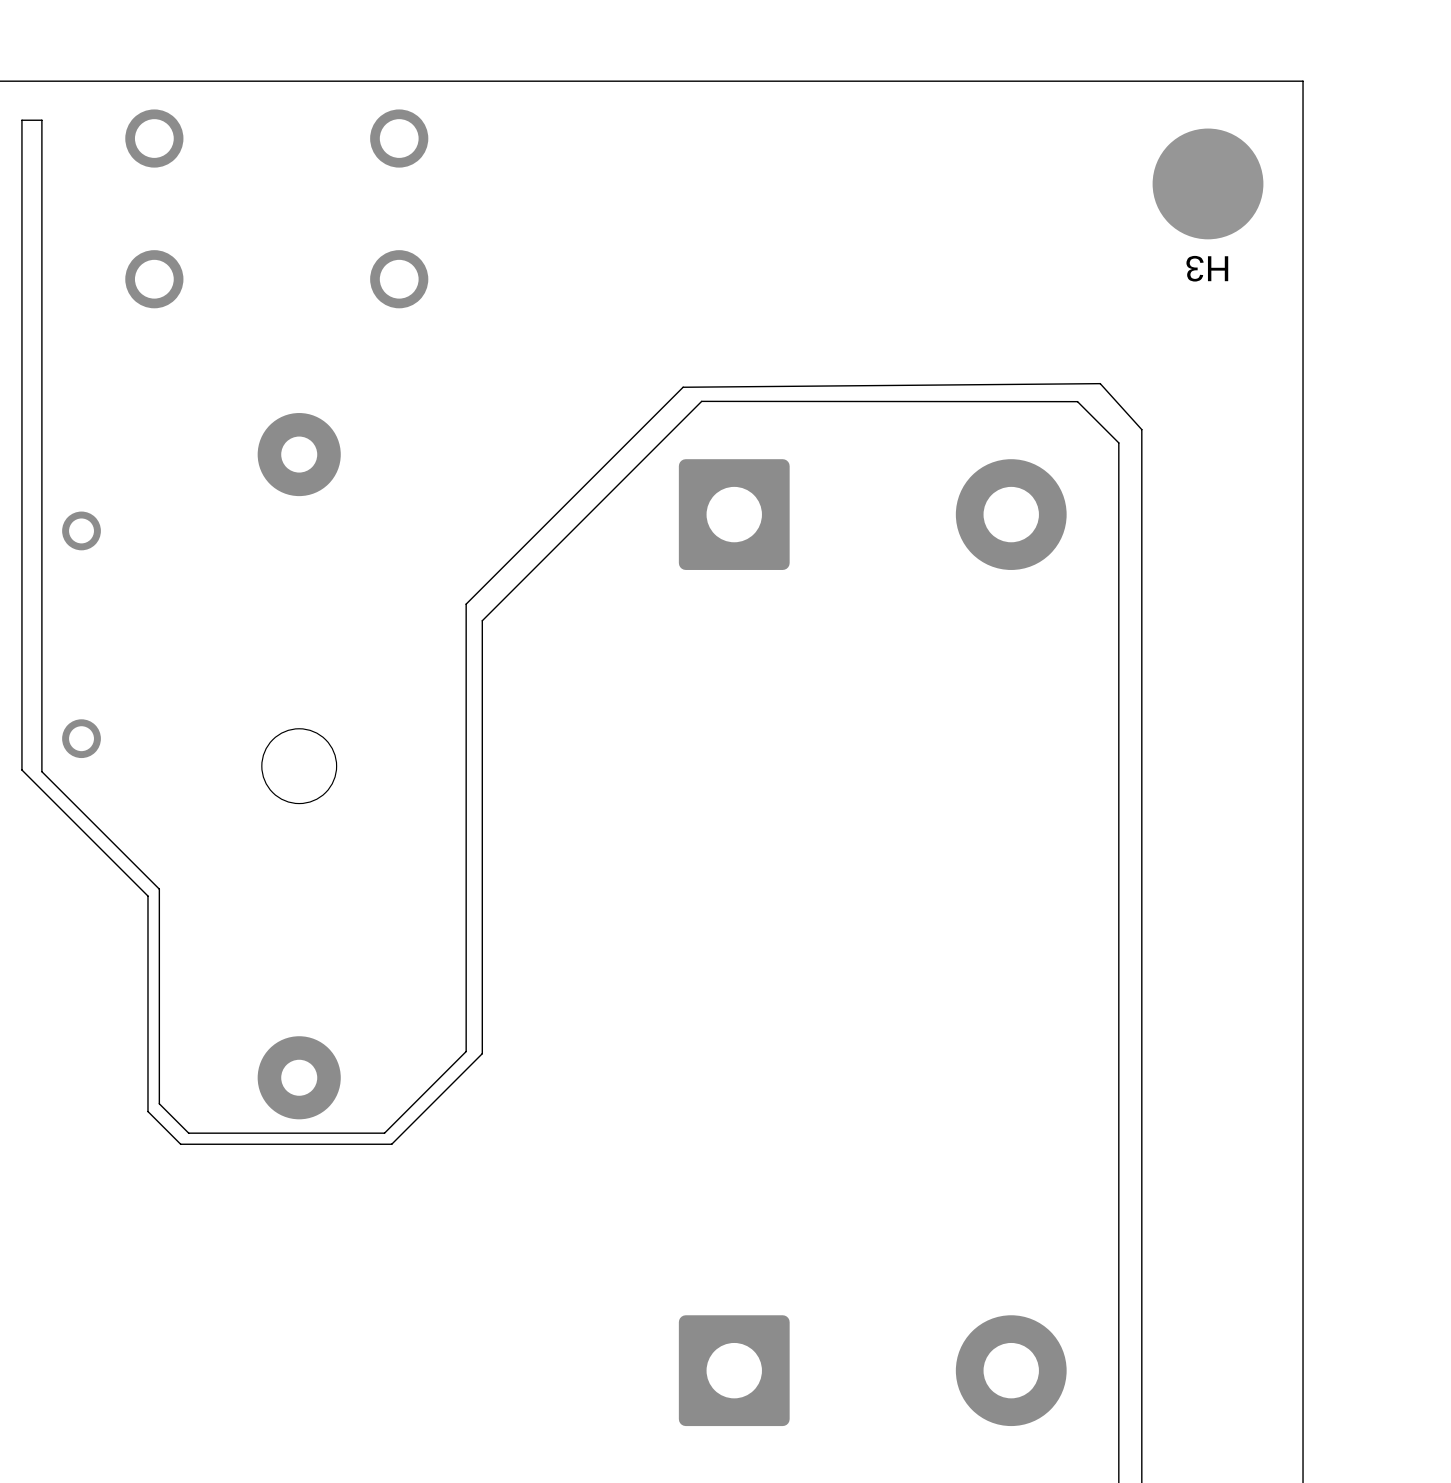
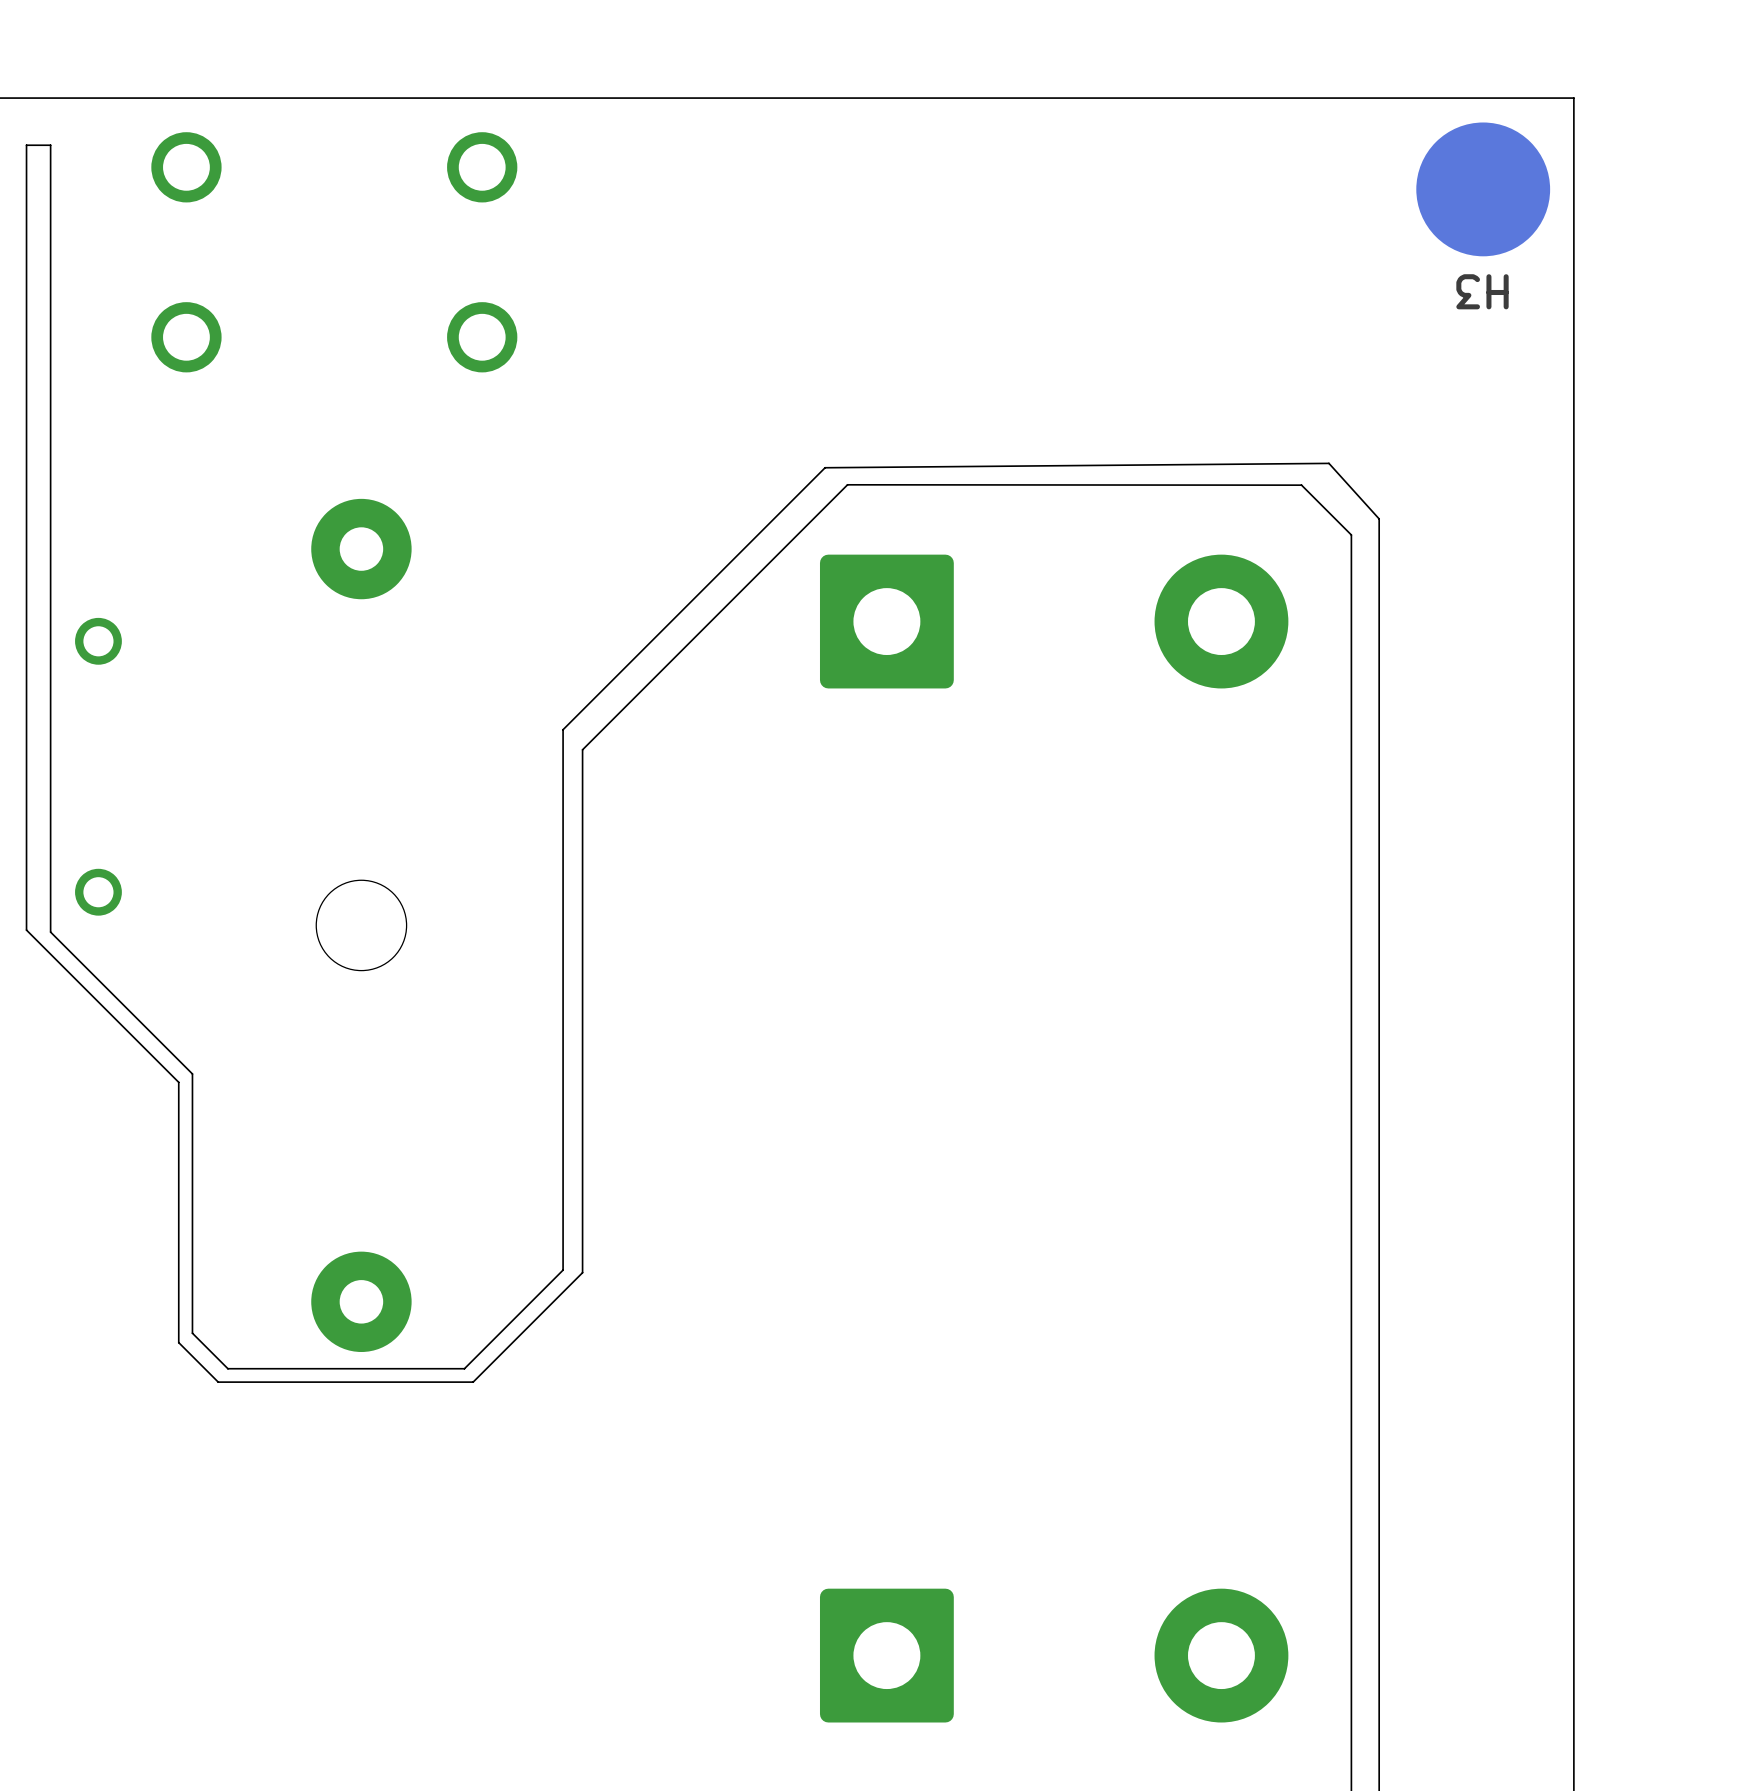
H3 position: (1208, 183) -> (1483, 189)

